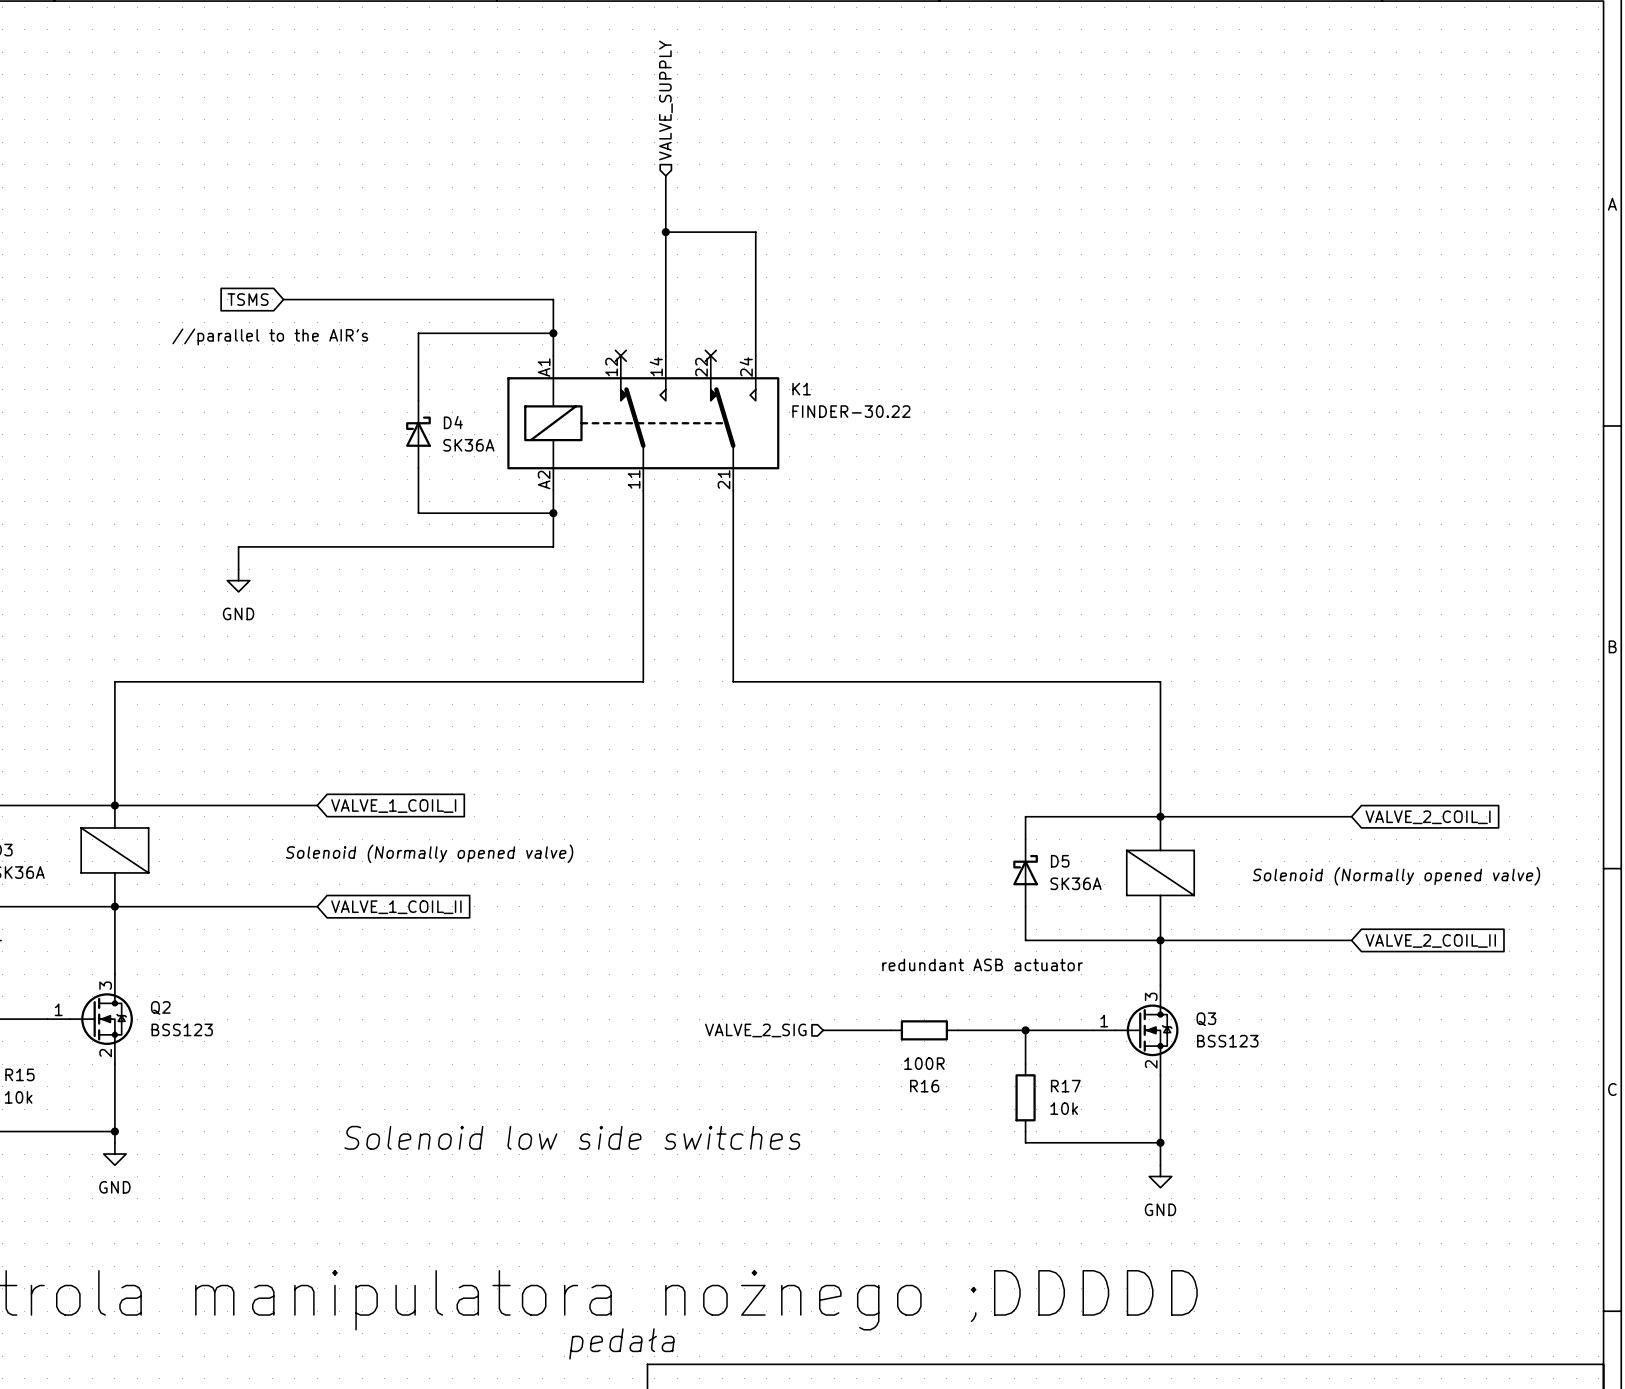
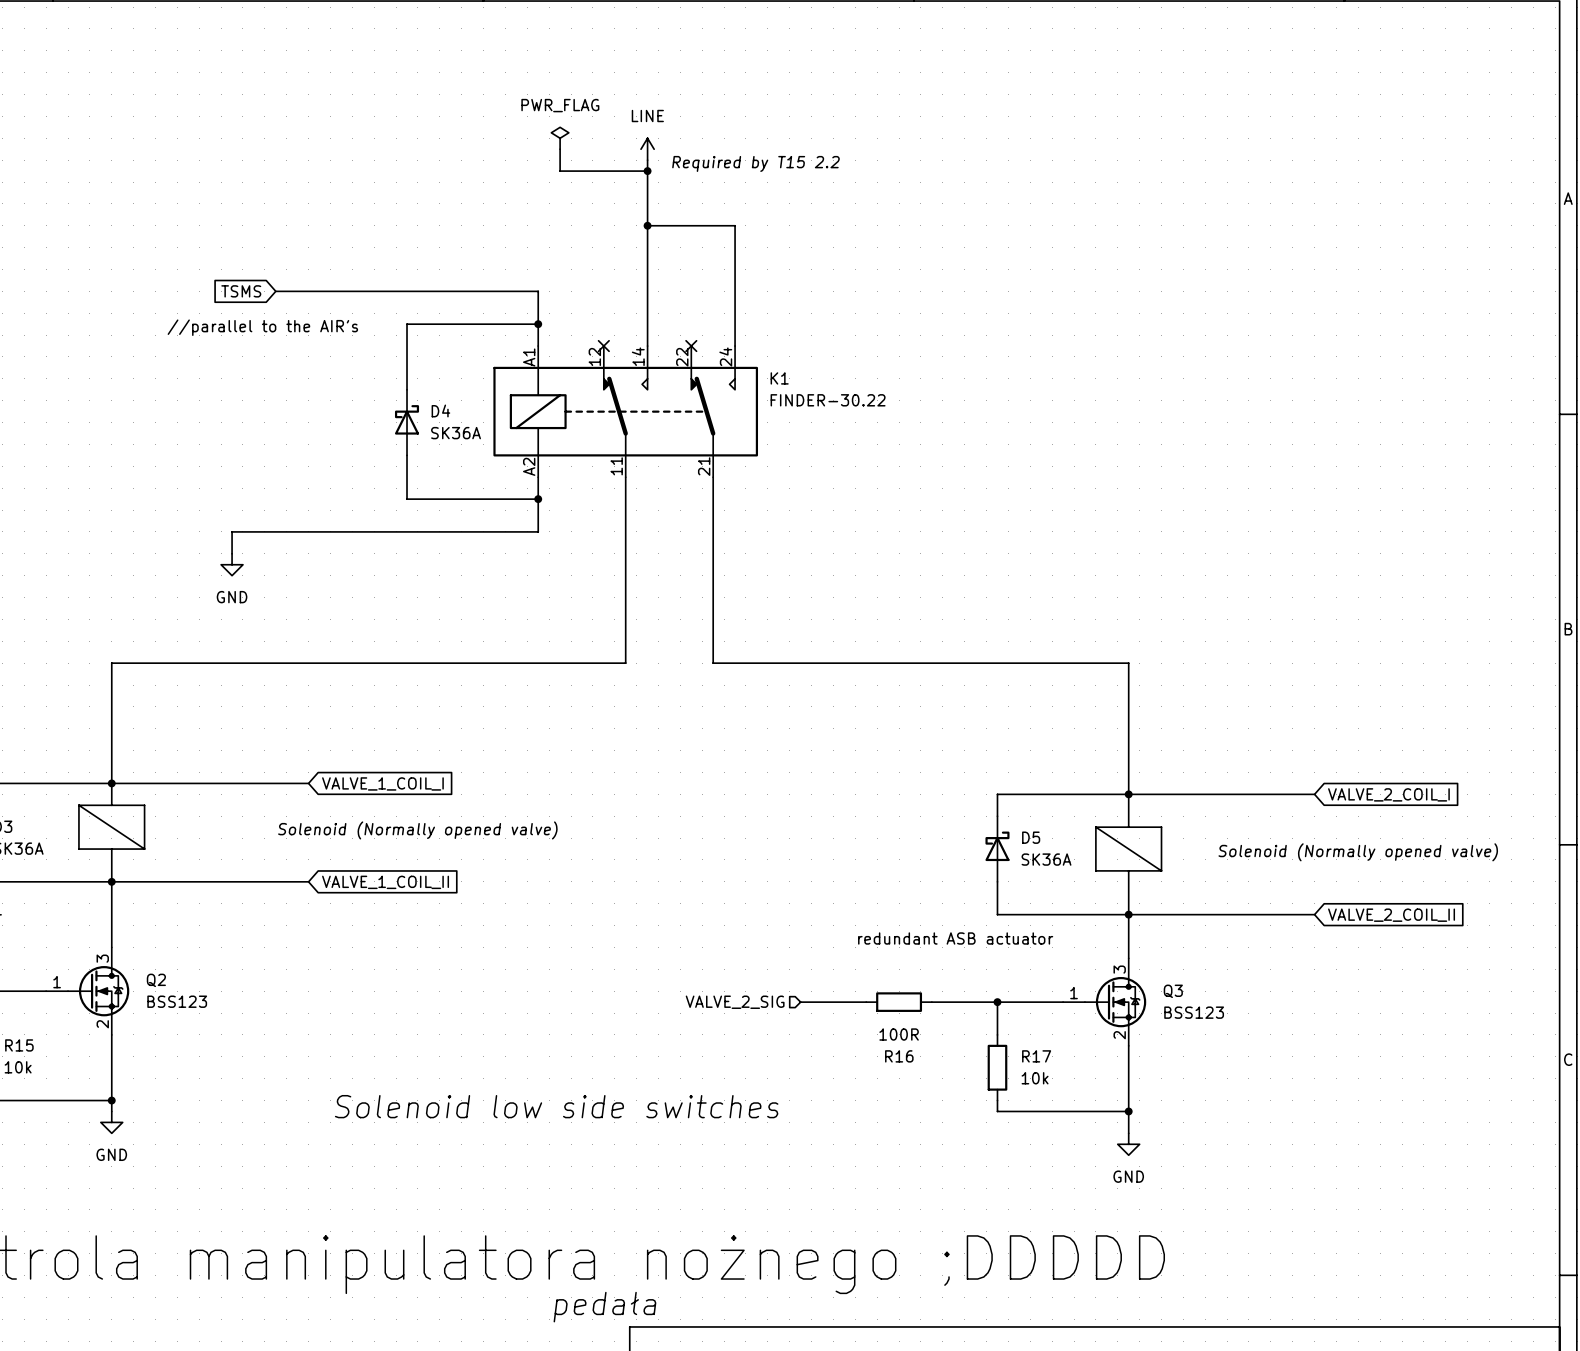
hierarchical label: VALVE_SUPPLY (665, 100) -> none
power symbol: none -> PWR_FLAG (560, 138)
wire: none -> (560, 149) (560, 171) (647, 171) (647, 160)
power symbol: none -> LINE (647, 149)
text: none -> Required by T15 2.2 (755, 163)
junction: none -> (647, 171)

